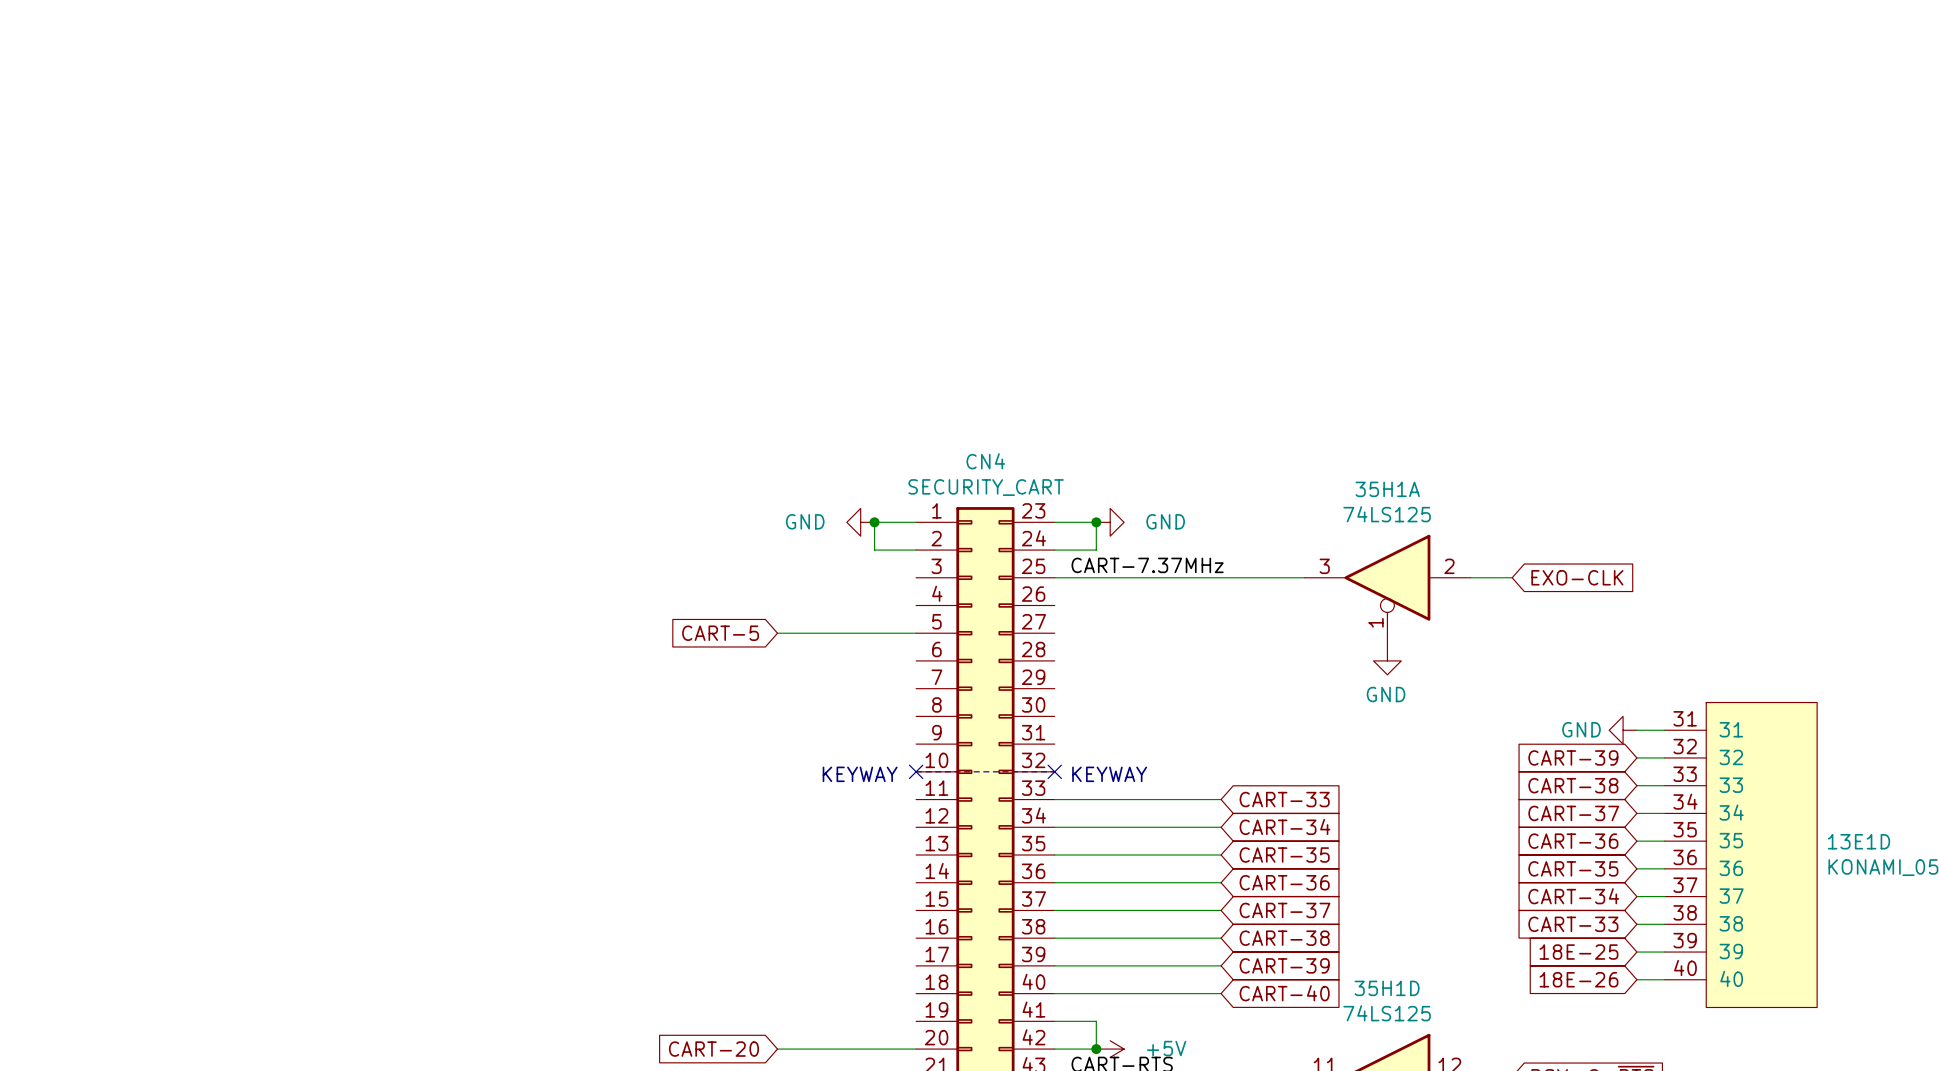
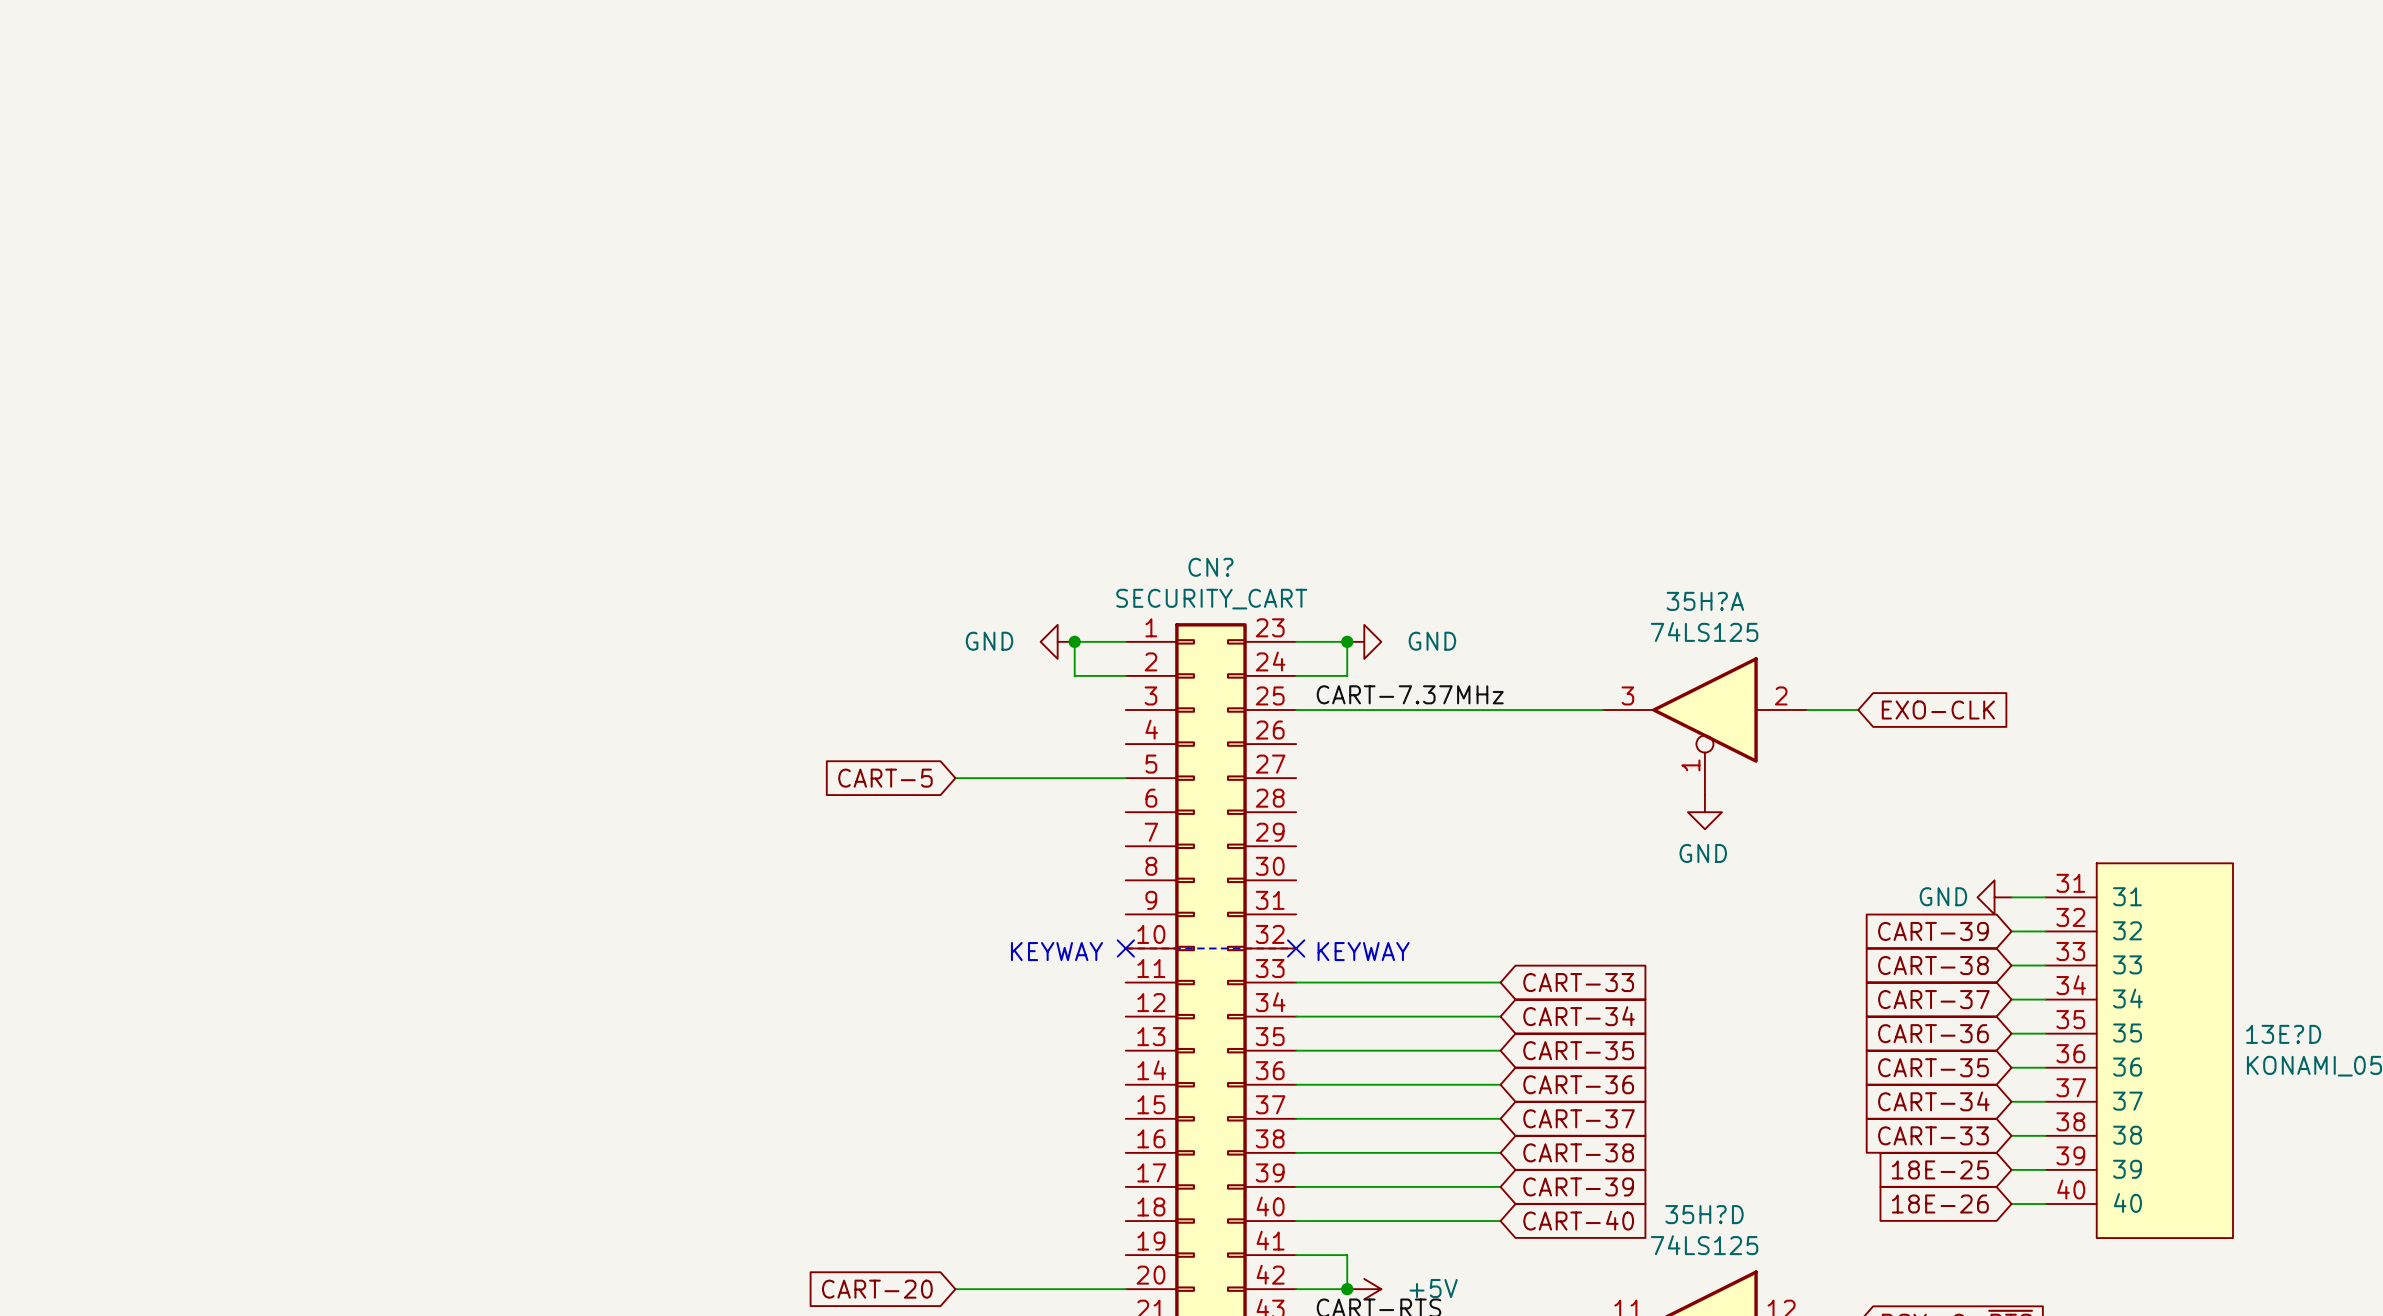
CN4 name: CN4 (985, 461) -> CN? (1210, 567)
35H1A name: 35H1A (1387, 489) -> 35H?A (1705, 601)
13E1D name: 13E1D (1858, 841) -> 13E?D (2283, 1034)
35H1D name: 35H1D (1387, 988) -> 35H?D (1704, 1214)

